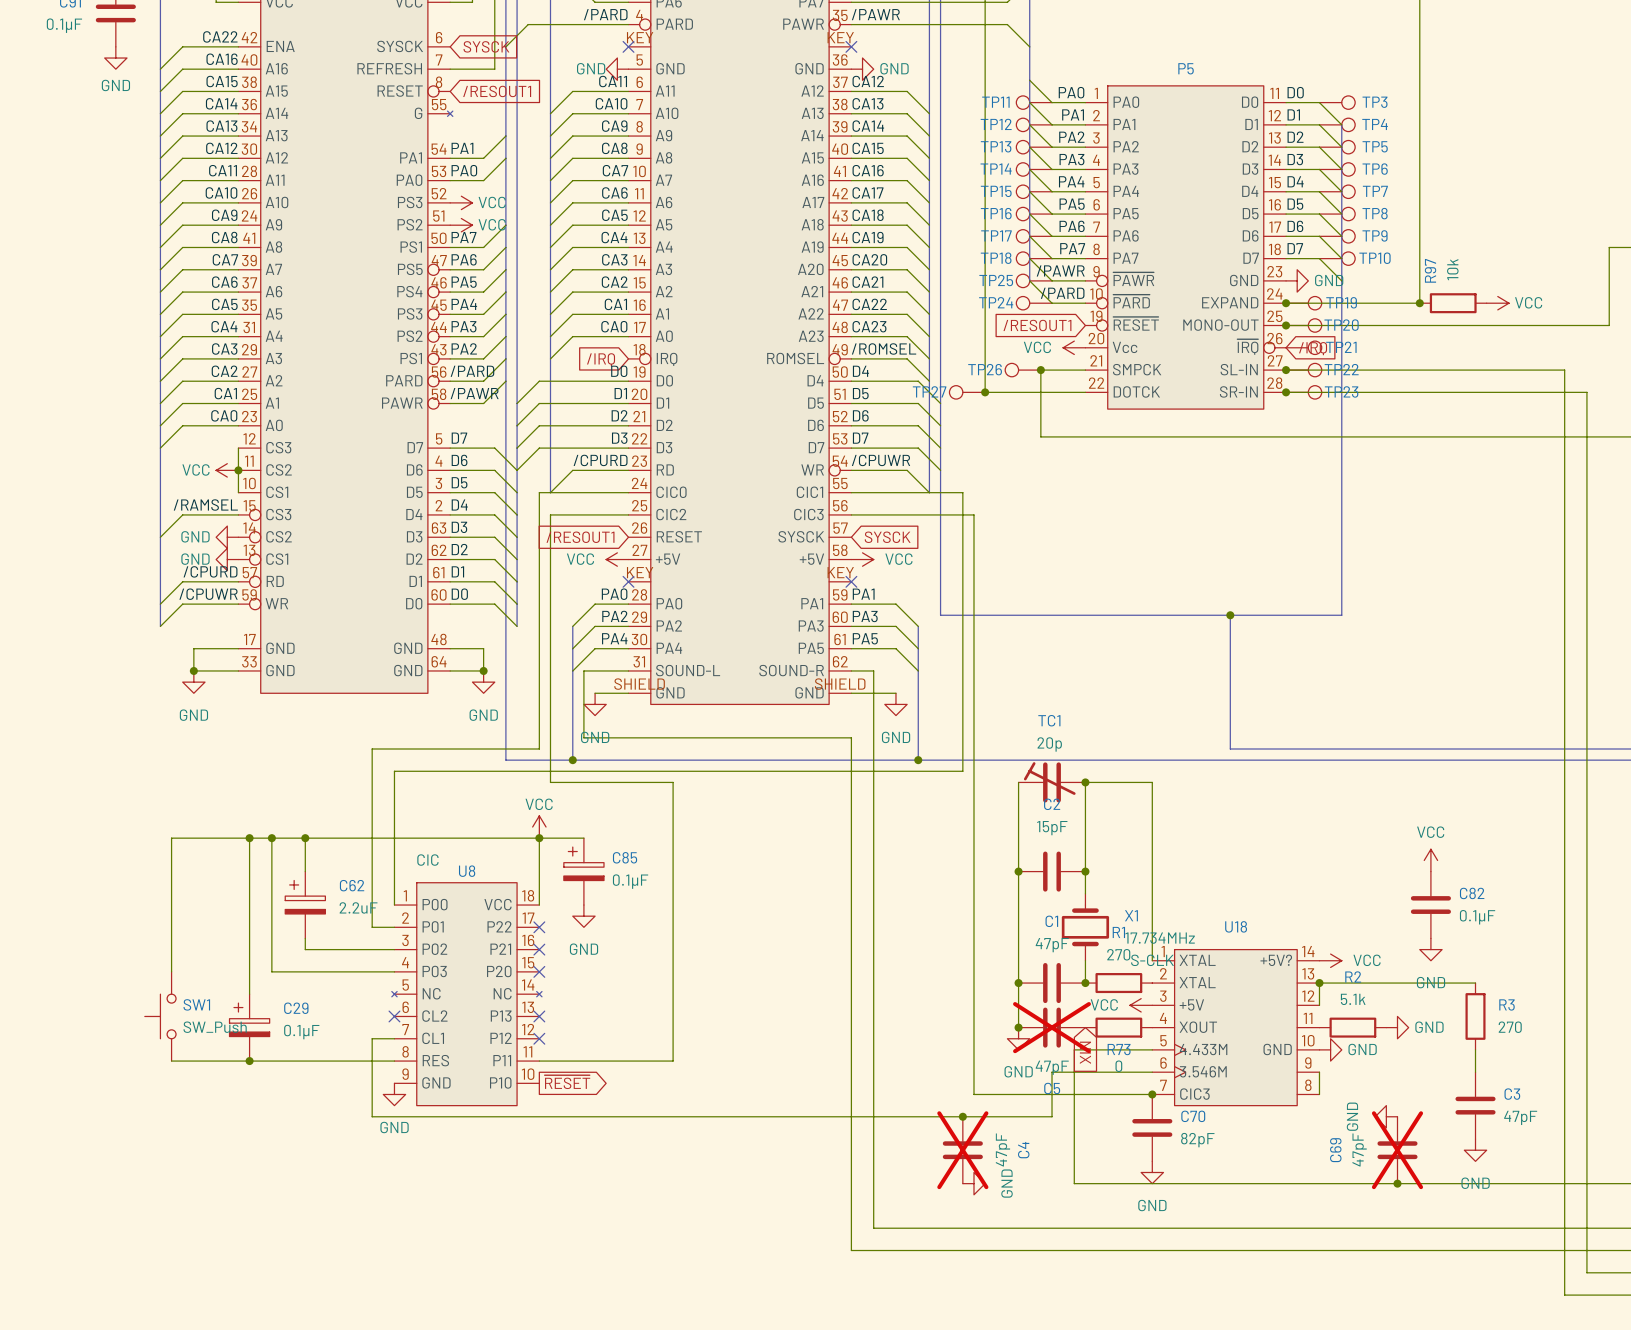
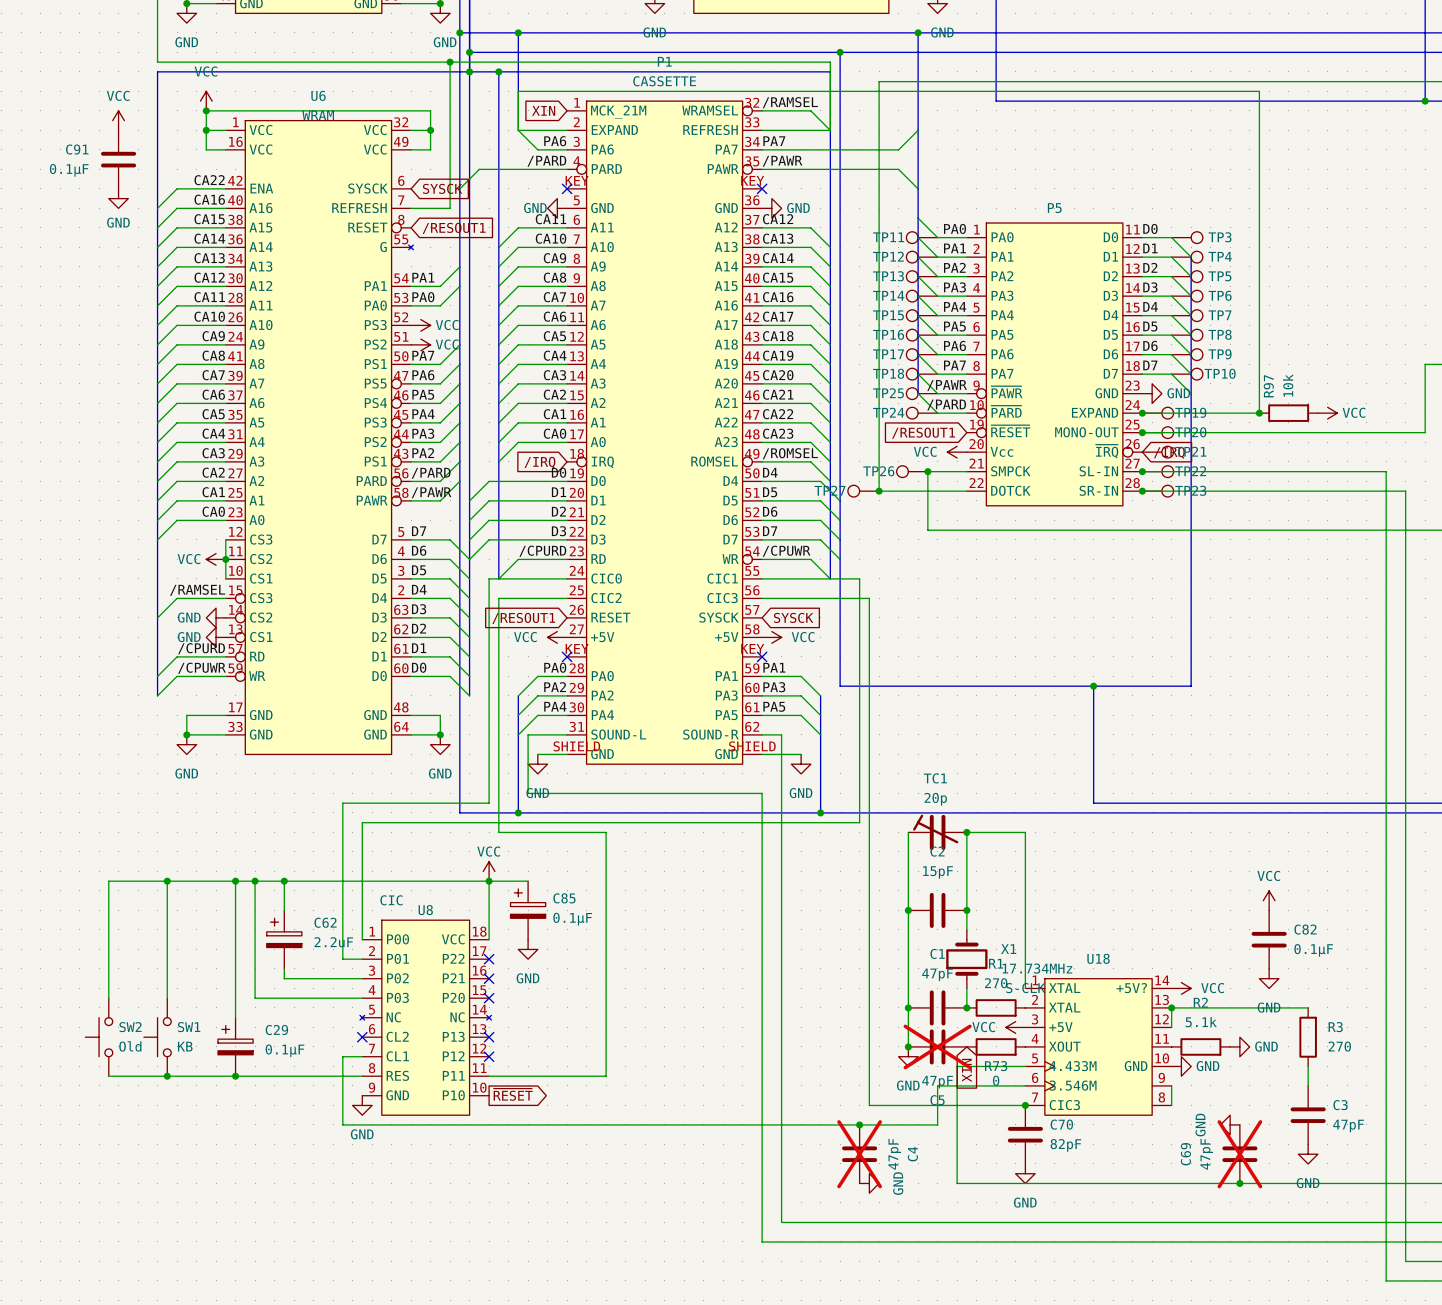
wire: none -> (167, 881) (108, 881) (108, 998)
junction: none -> (167, 881)
SW2: none -> Old (99, 1037)
SW1 value: SW_Push (215, 1027) -> KB (185, 1046)
wire: none -> (108, 1076) (167, 1076)
junction: none -> (167, 1076)

